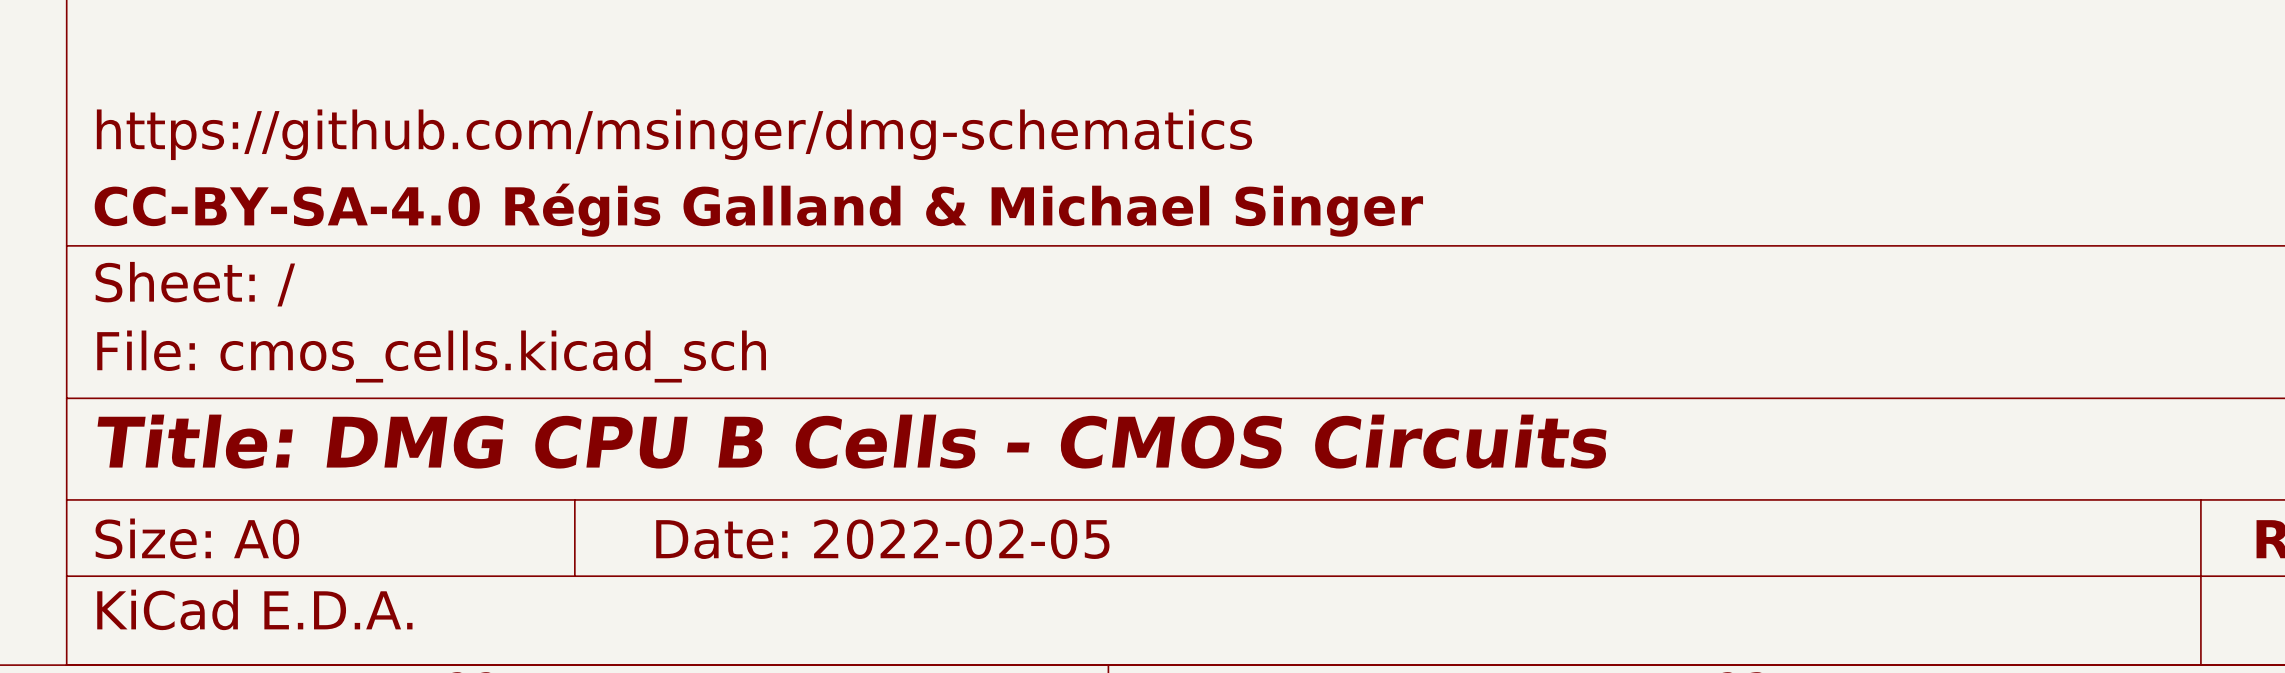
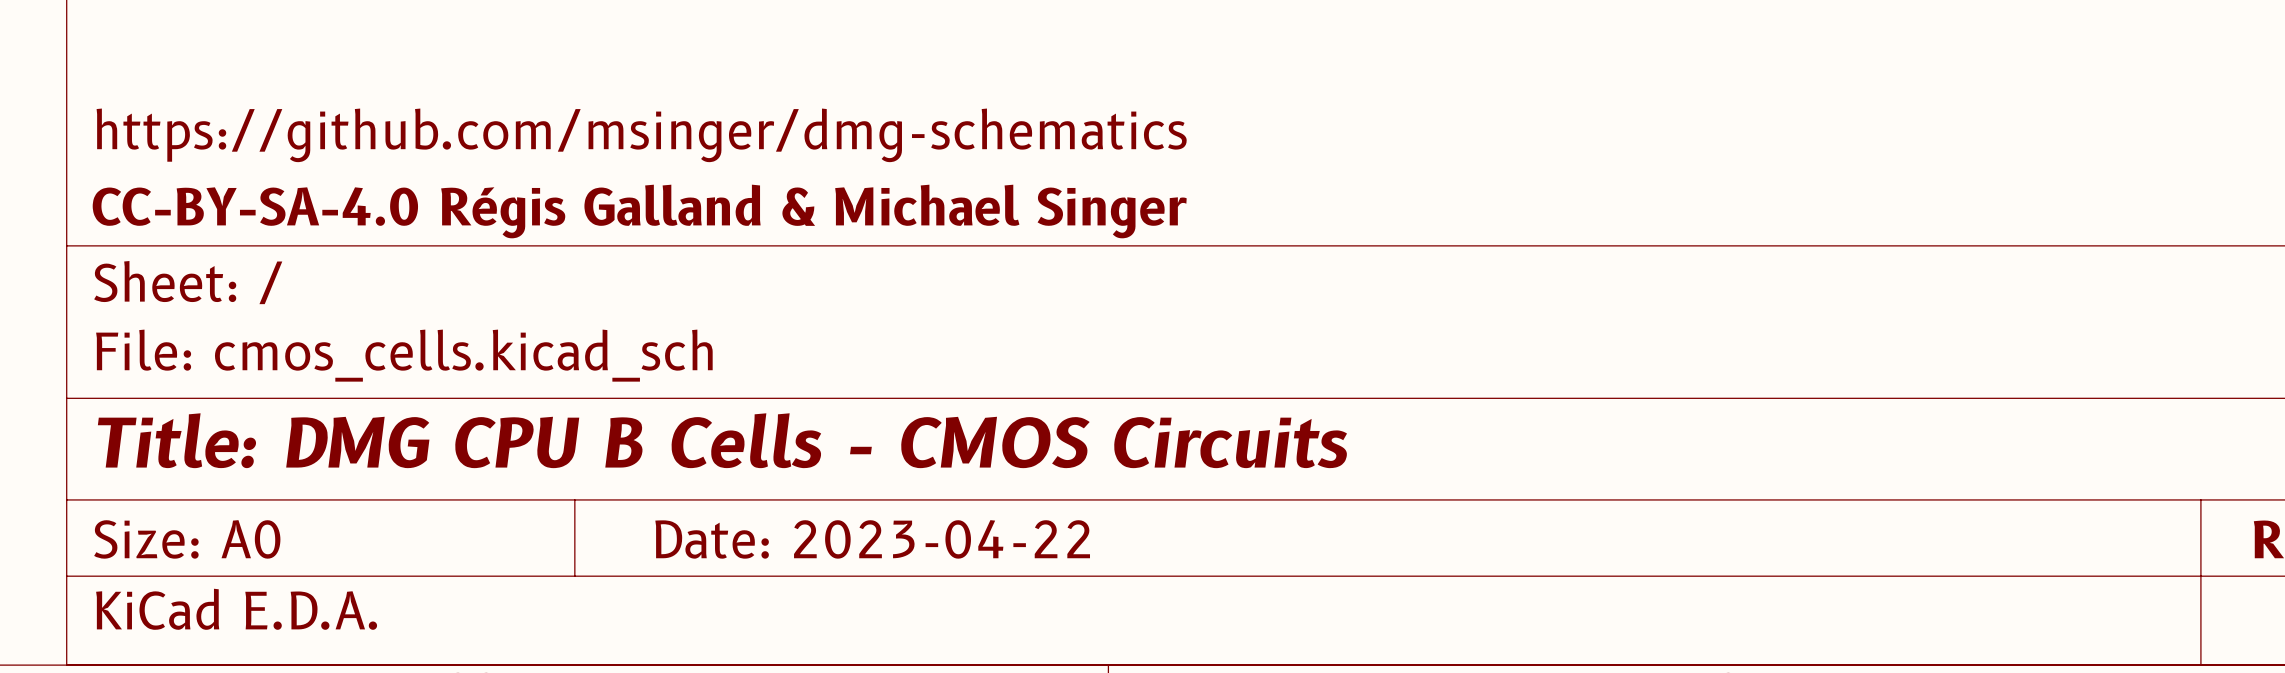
title block: Date: 2022-02-05 (882, 539) -> Date: 2023-04-22 (872, 539)

